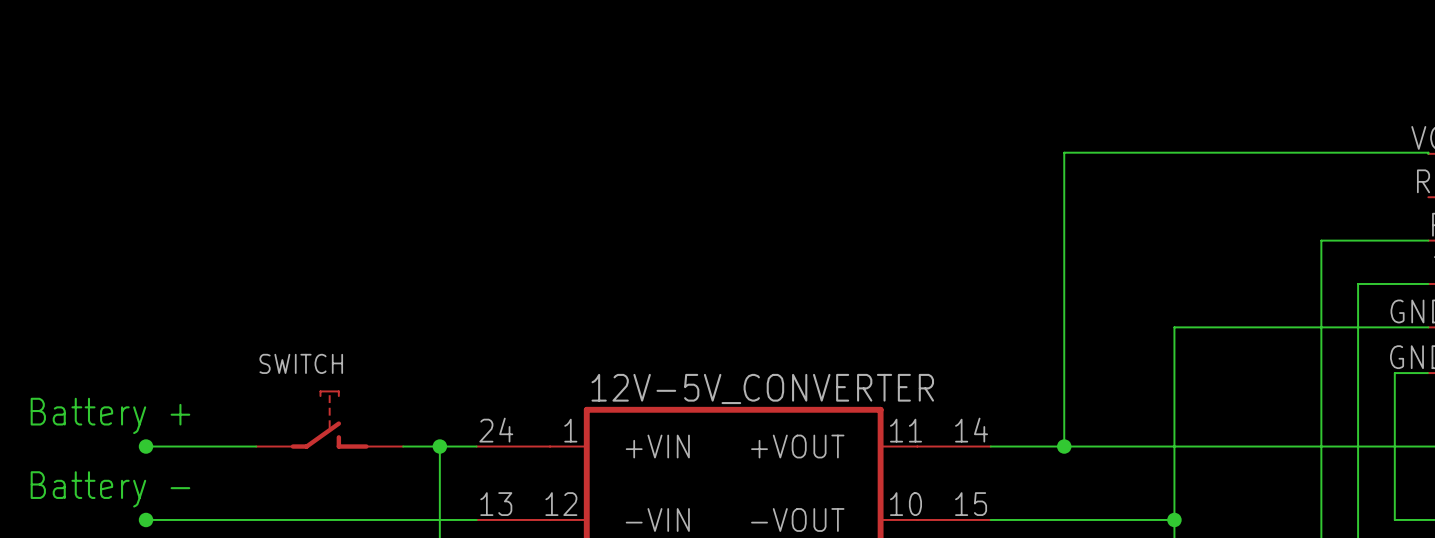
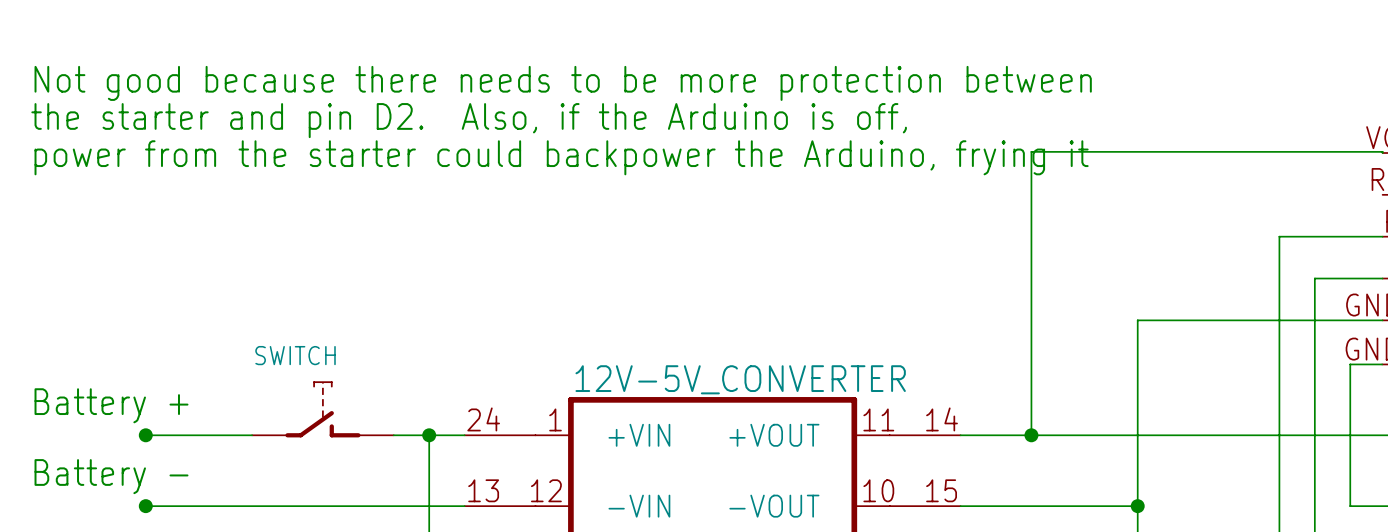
text: none -> Not good because there needs to be more protection between (563, 83)
text: none -> the starter and pin D2. Also, if the Arduino is off, (469, 120)
text: none -> power from the starter could backpower the Arduino, frying it (561, 157)

